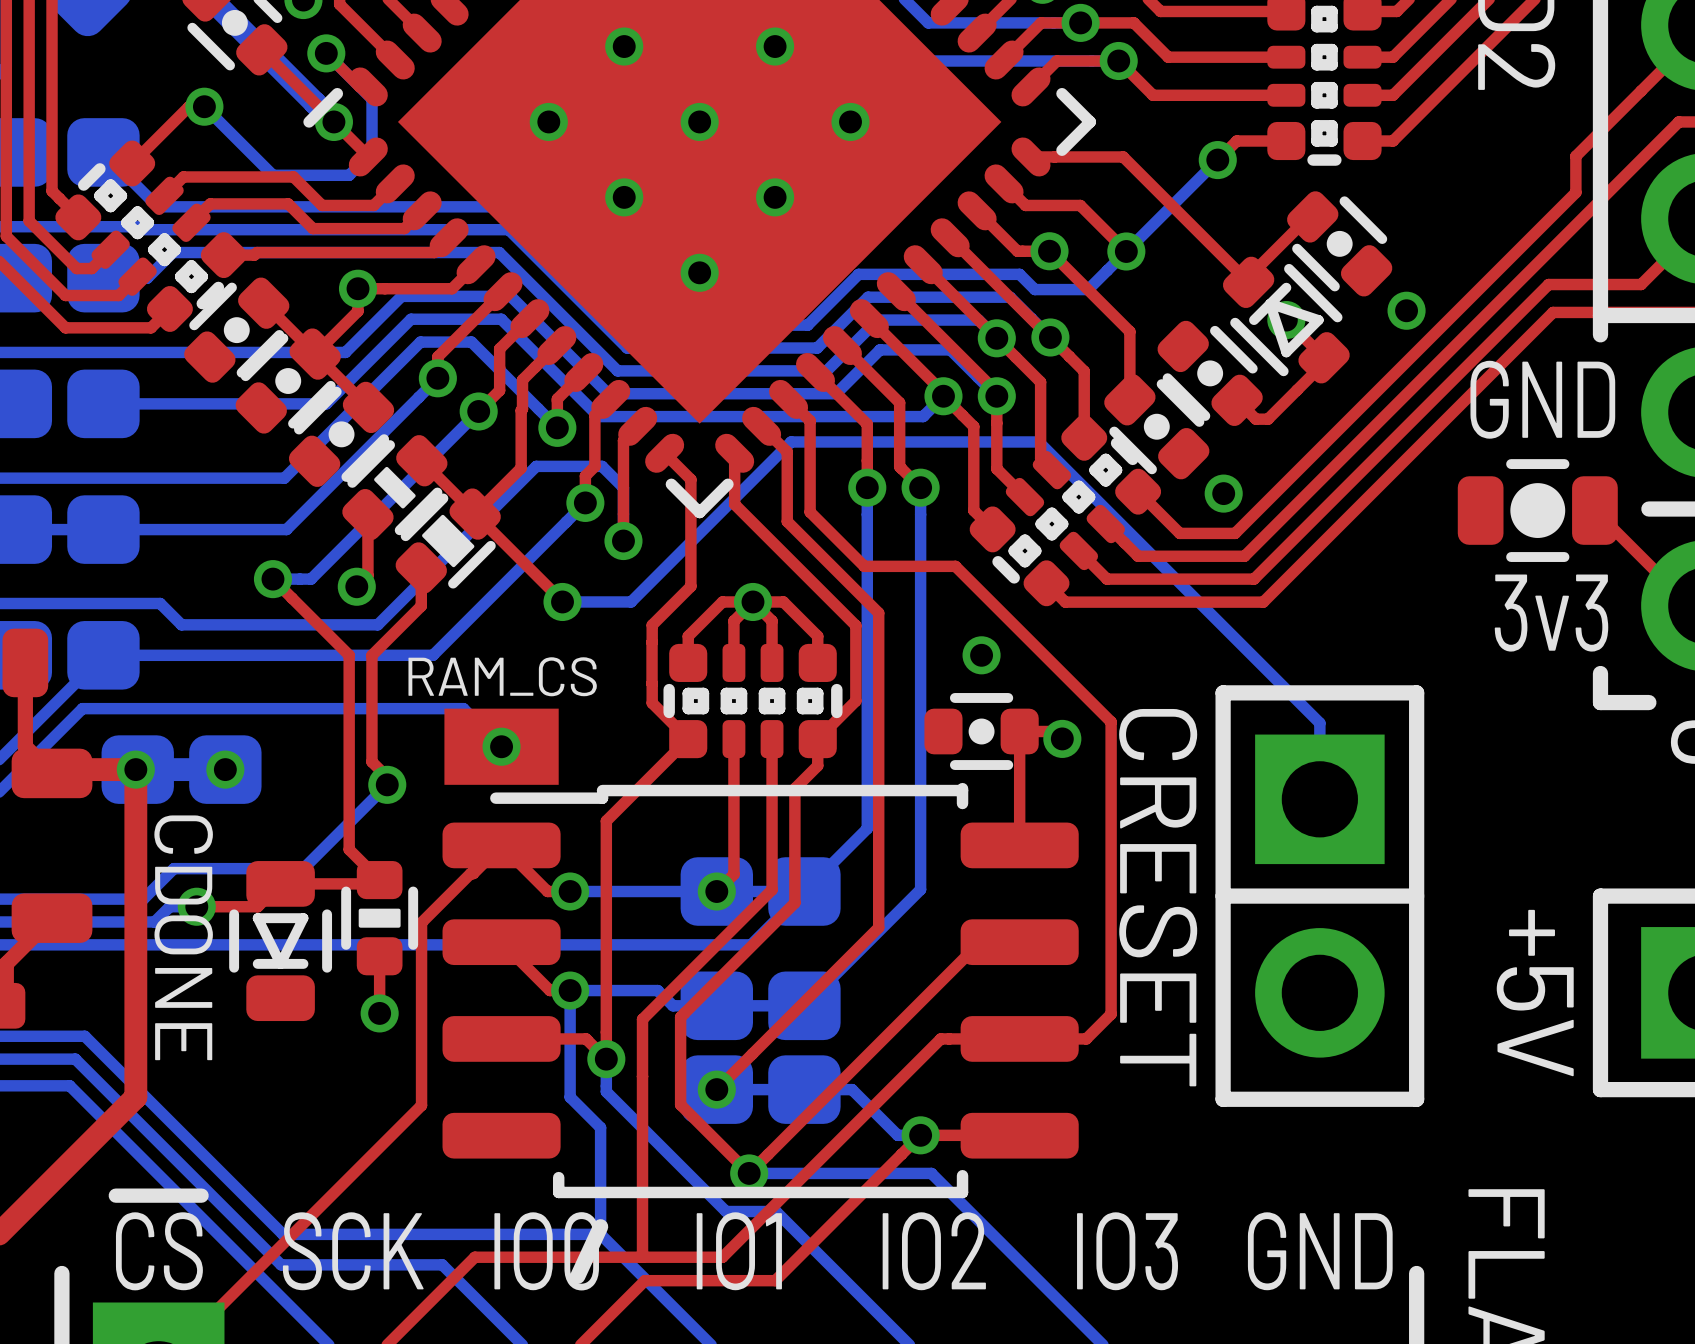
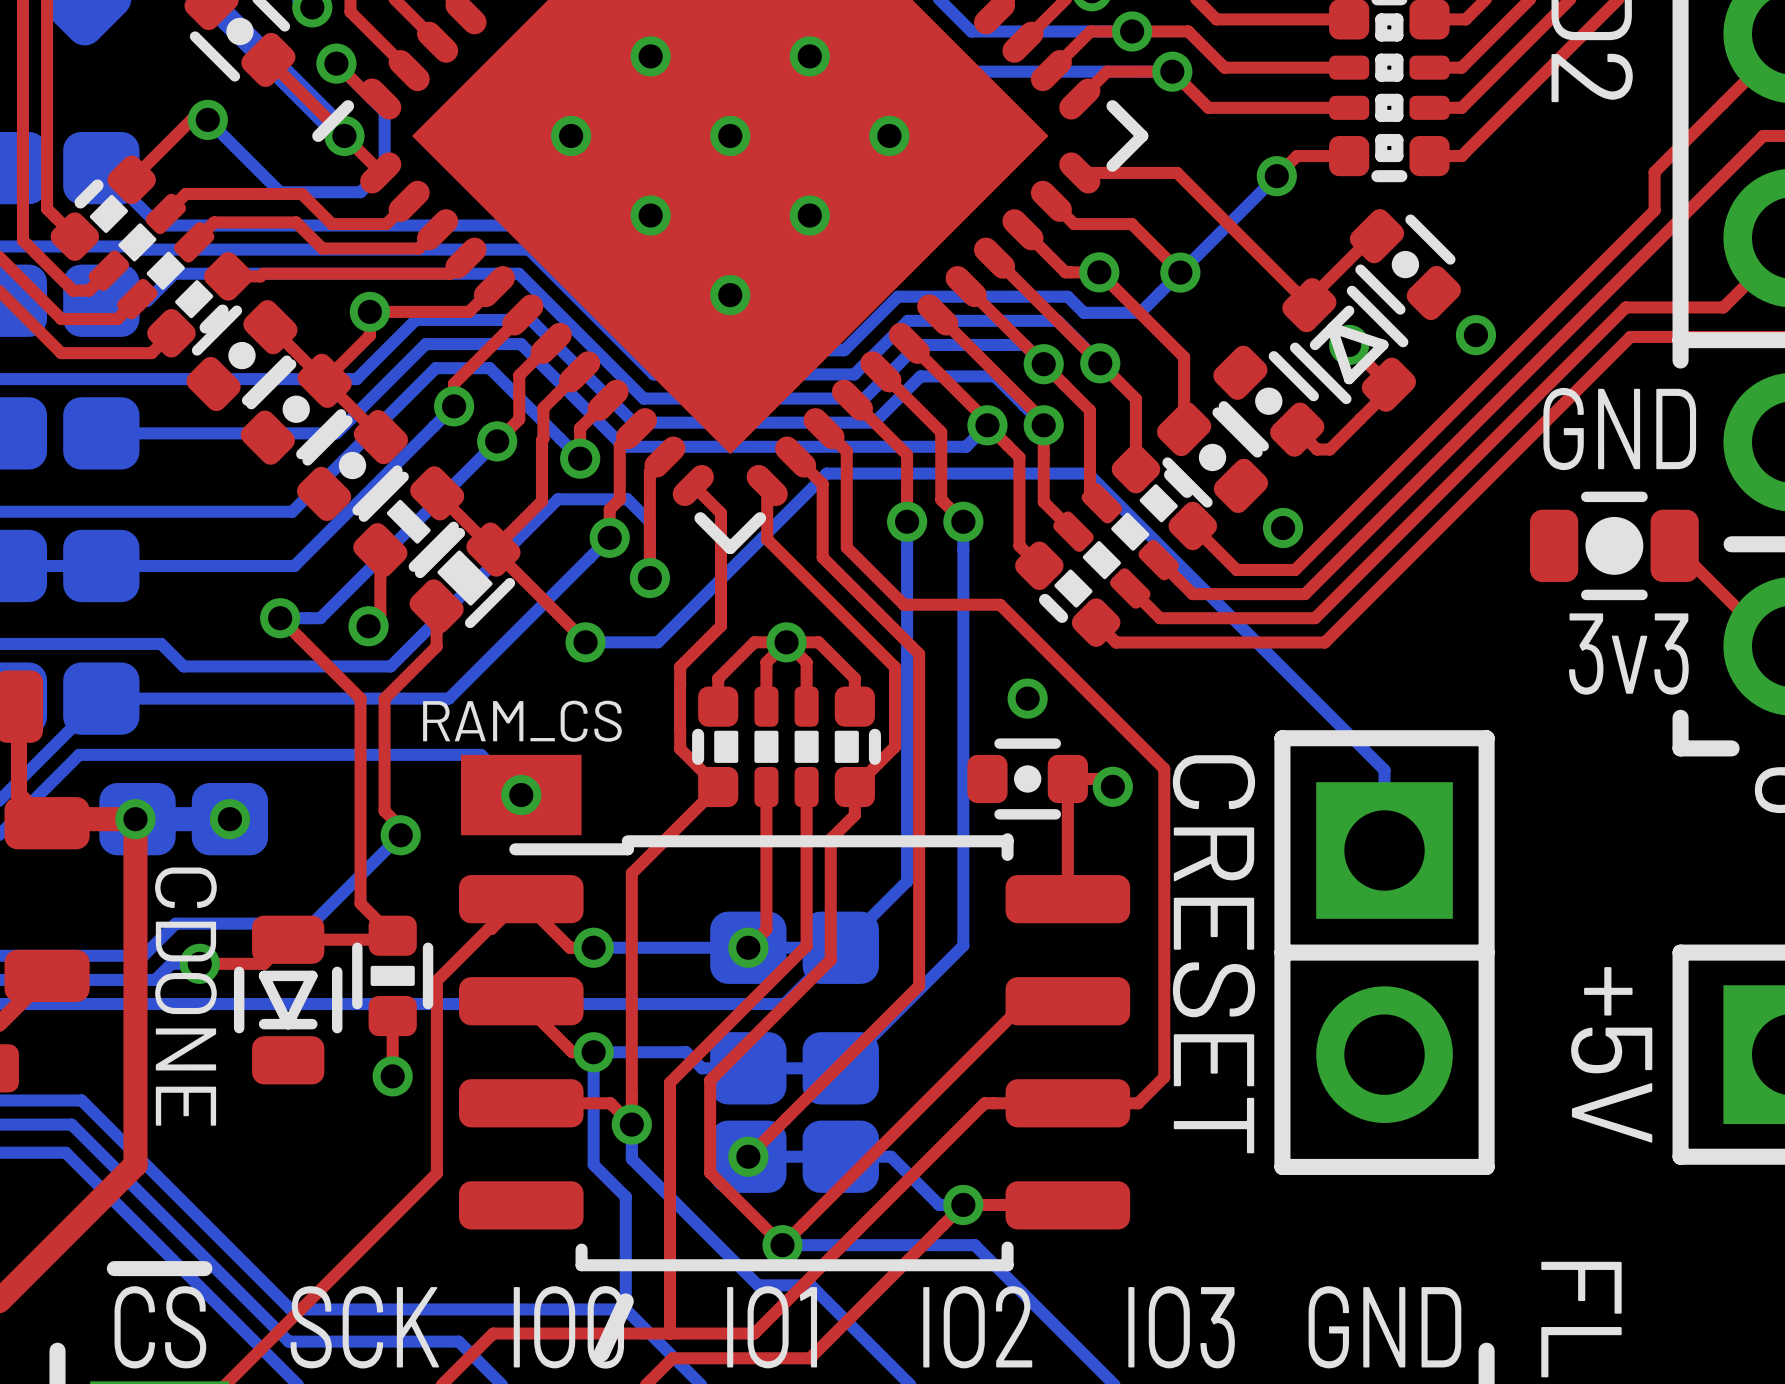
part footprint: [55, 140, 247, 332] -> [50, 155, 253, 358]
part footprint: [969, 414, 1162, 607] -> [1015, 444, 1218, 647]
part footprint: [663, 643, 843, 759] -> [692, 686, 881, 808]

